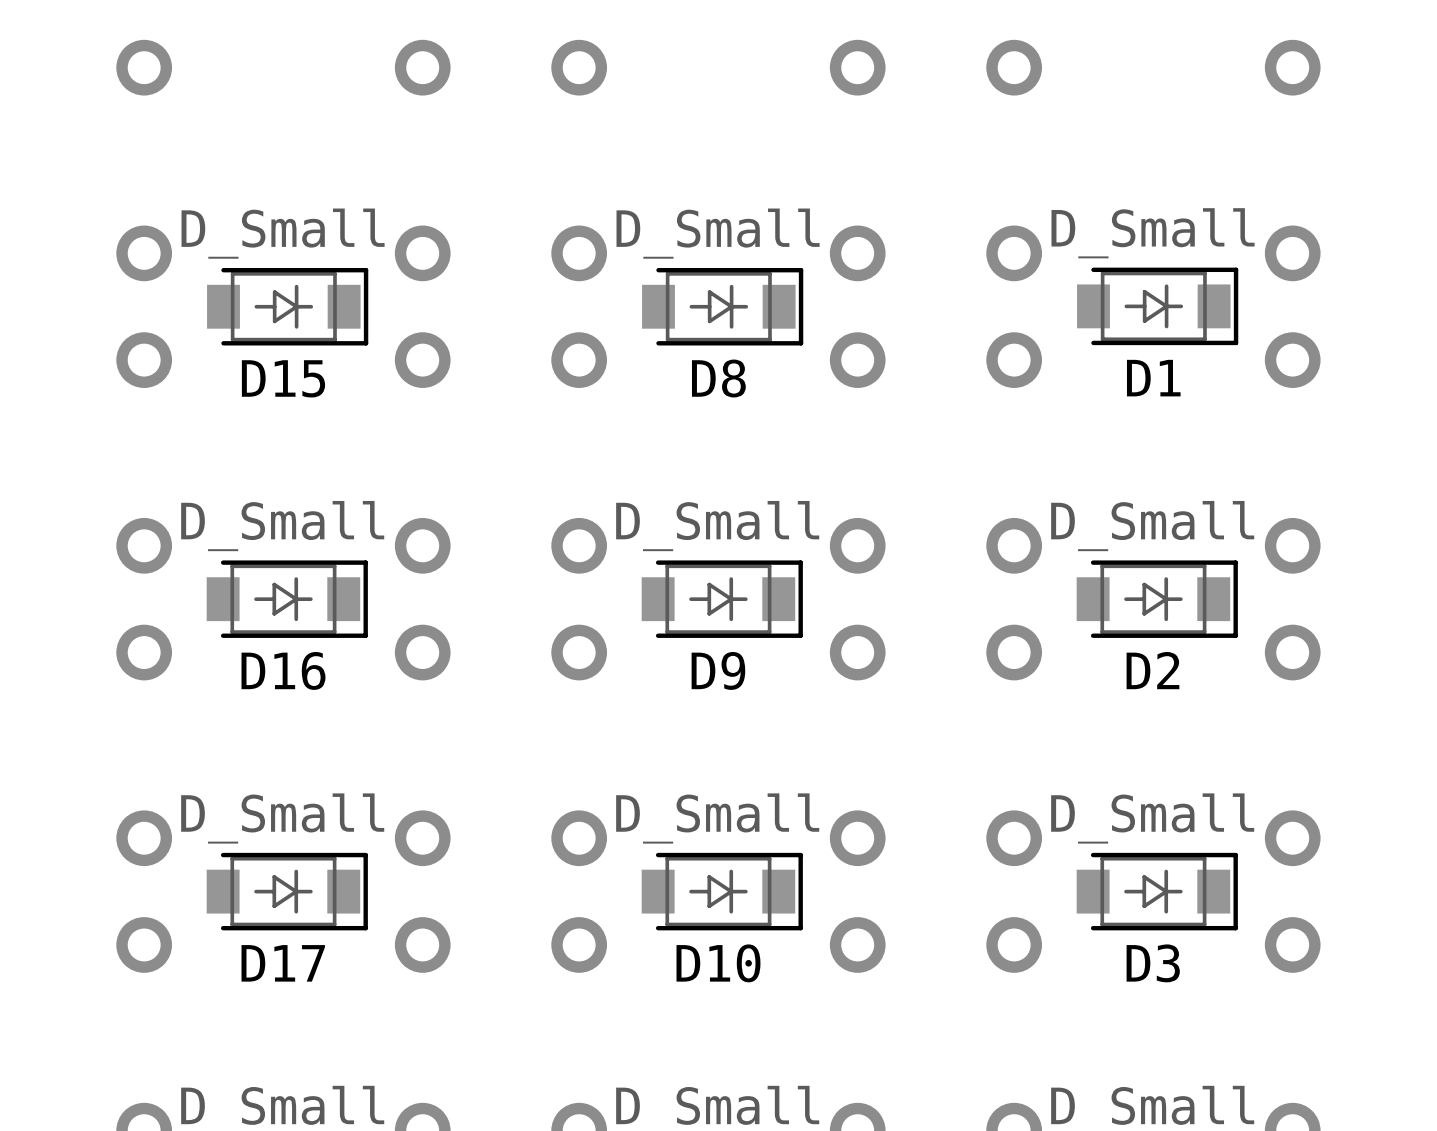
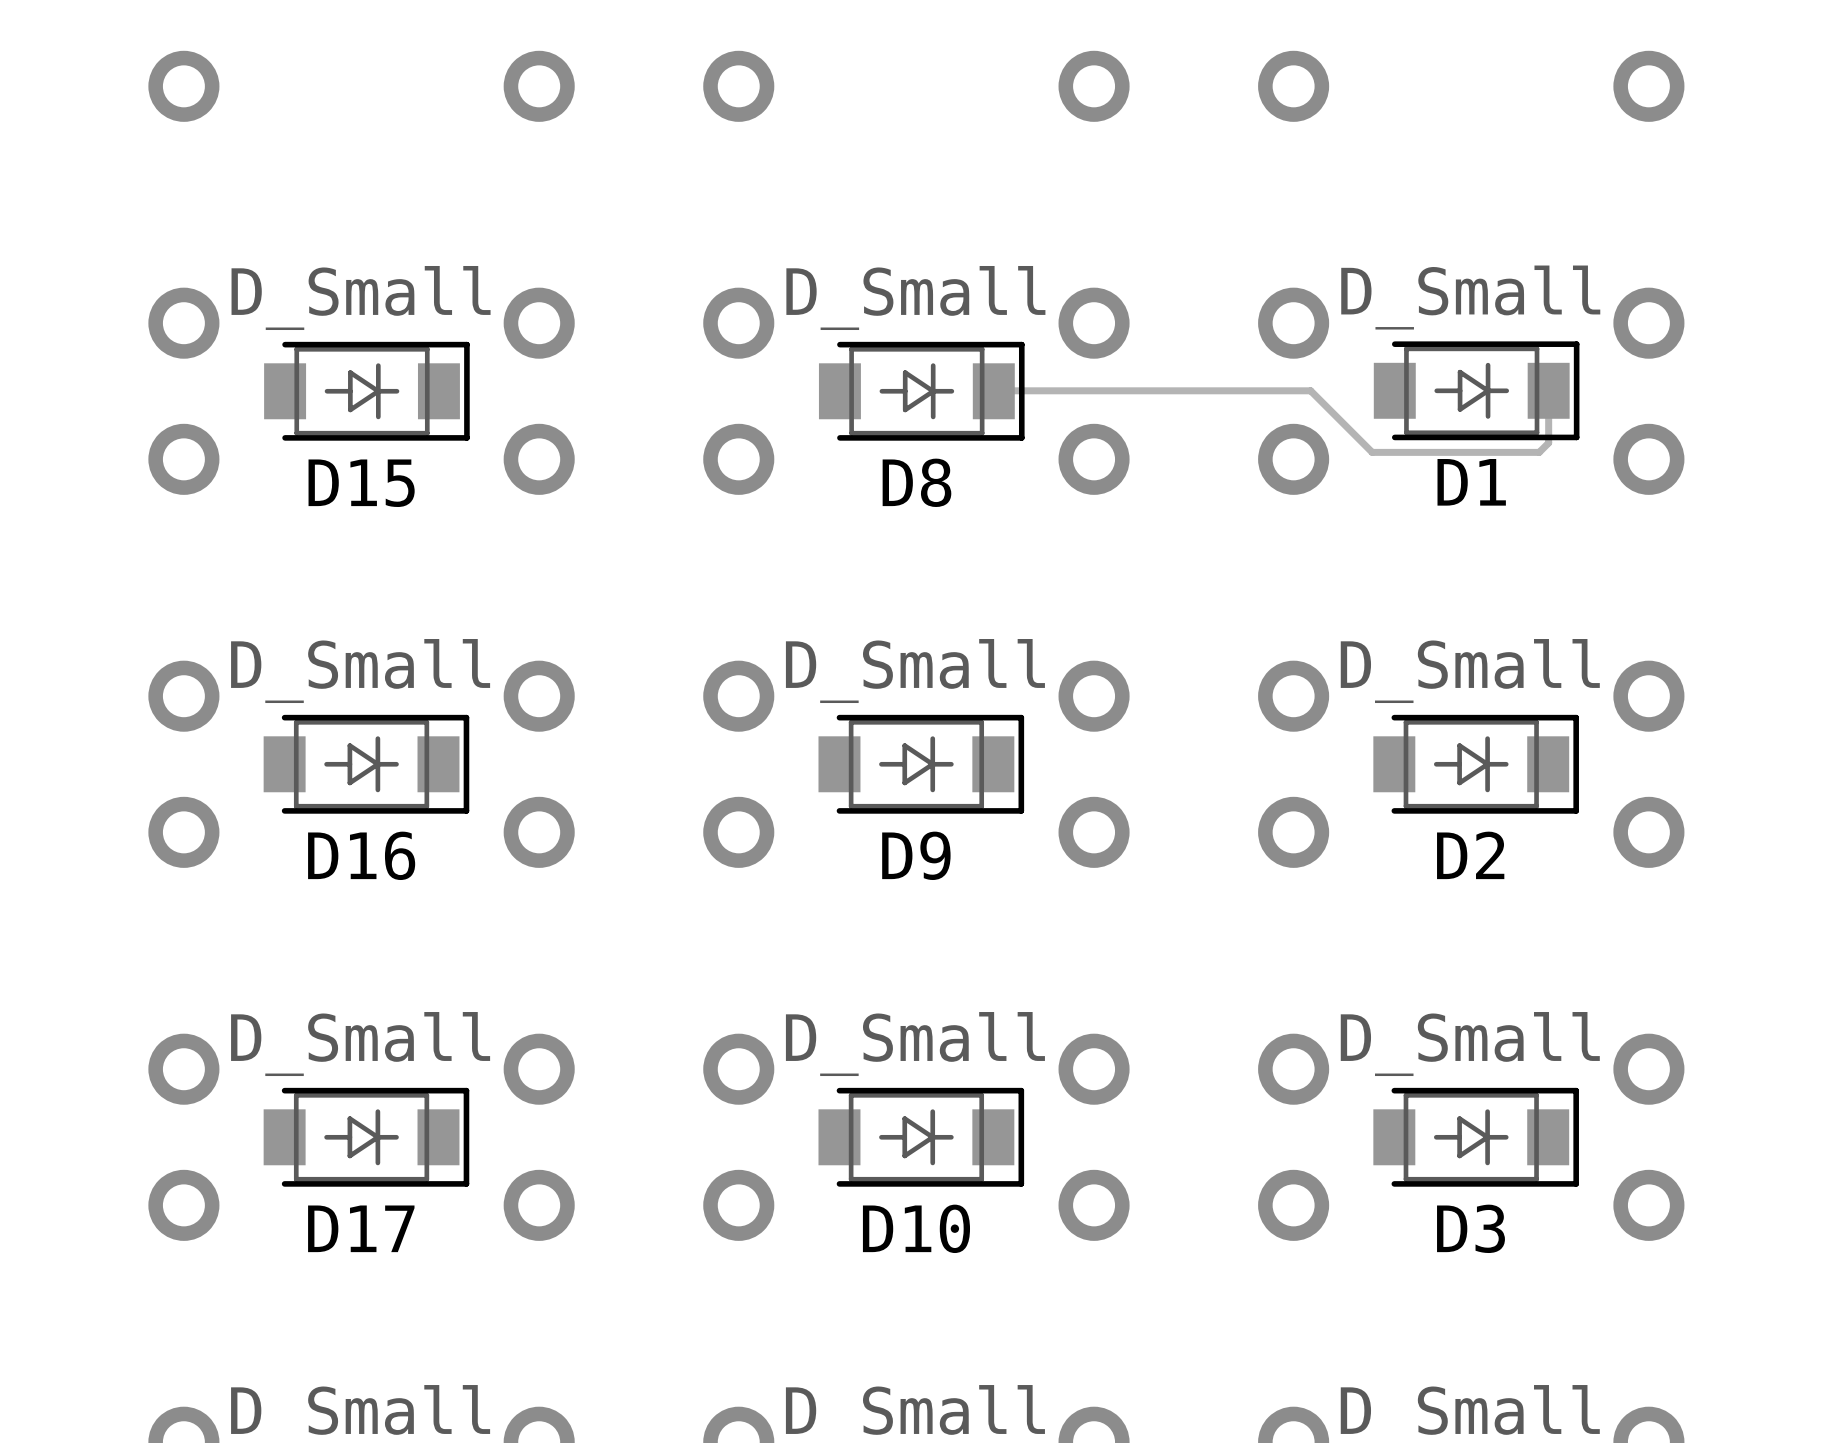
track: none -> (1548, 390) (1548, 442) (1539, 452) (1372, 452) (1310, 390) (990, 390)

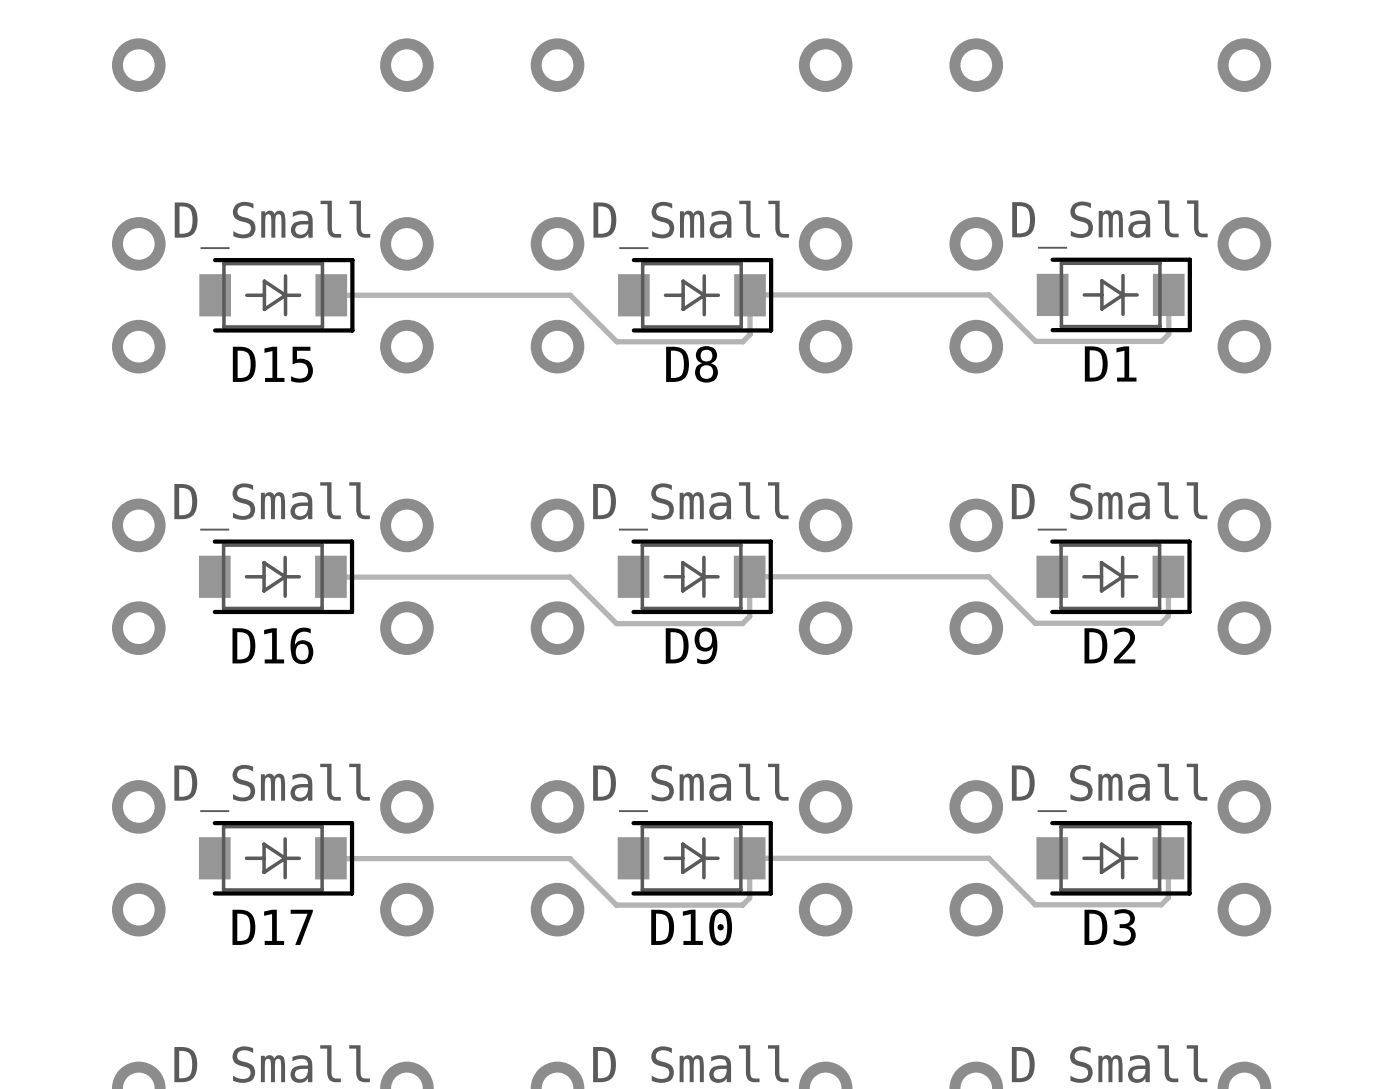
track: none -> (750, 295) (750, 334) (742, 341) (616, 341) (570, 295) (329, 295)
track: none -> (749, 577) (749, 616) (742, 623) (616, 623) (570, 577) (328, 577)
track: none -> (1168, 576) (1168, 616) (1161, 623) (1035, 623) (988, 576) (747, 576)
track: none -> (749, 858) (749, 897) (742, 905) (616, 905) (570, 858) (328, 858)
track: none -> (1168, 858) (1168, 897) (1161, 904) (1035, 904) (988, 858) (747, 858)

